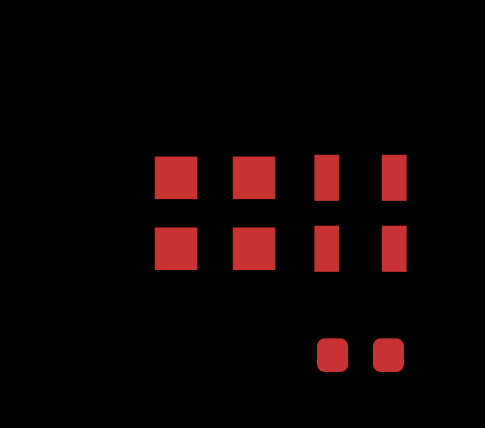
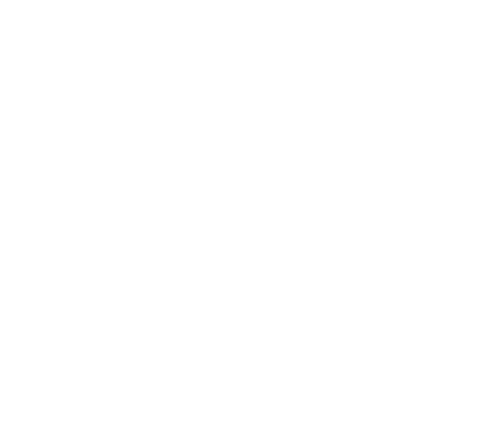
part: (215, 177) -> none
part: (360, 177) -> none
part: (215, 248) -> none
part: (360, 248) -> none
part: (360, 355) -> none

